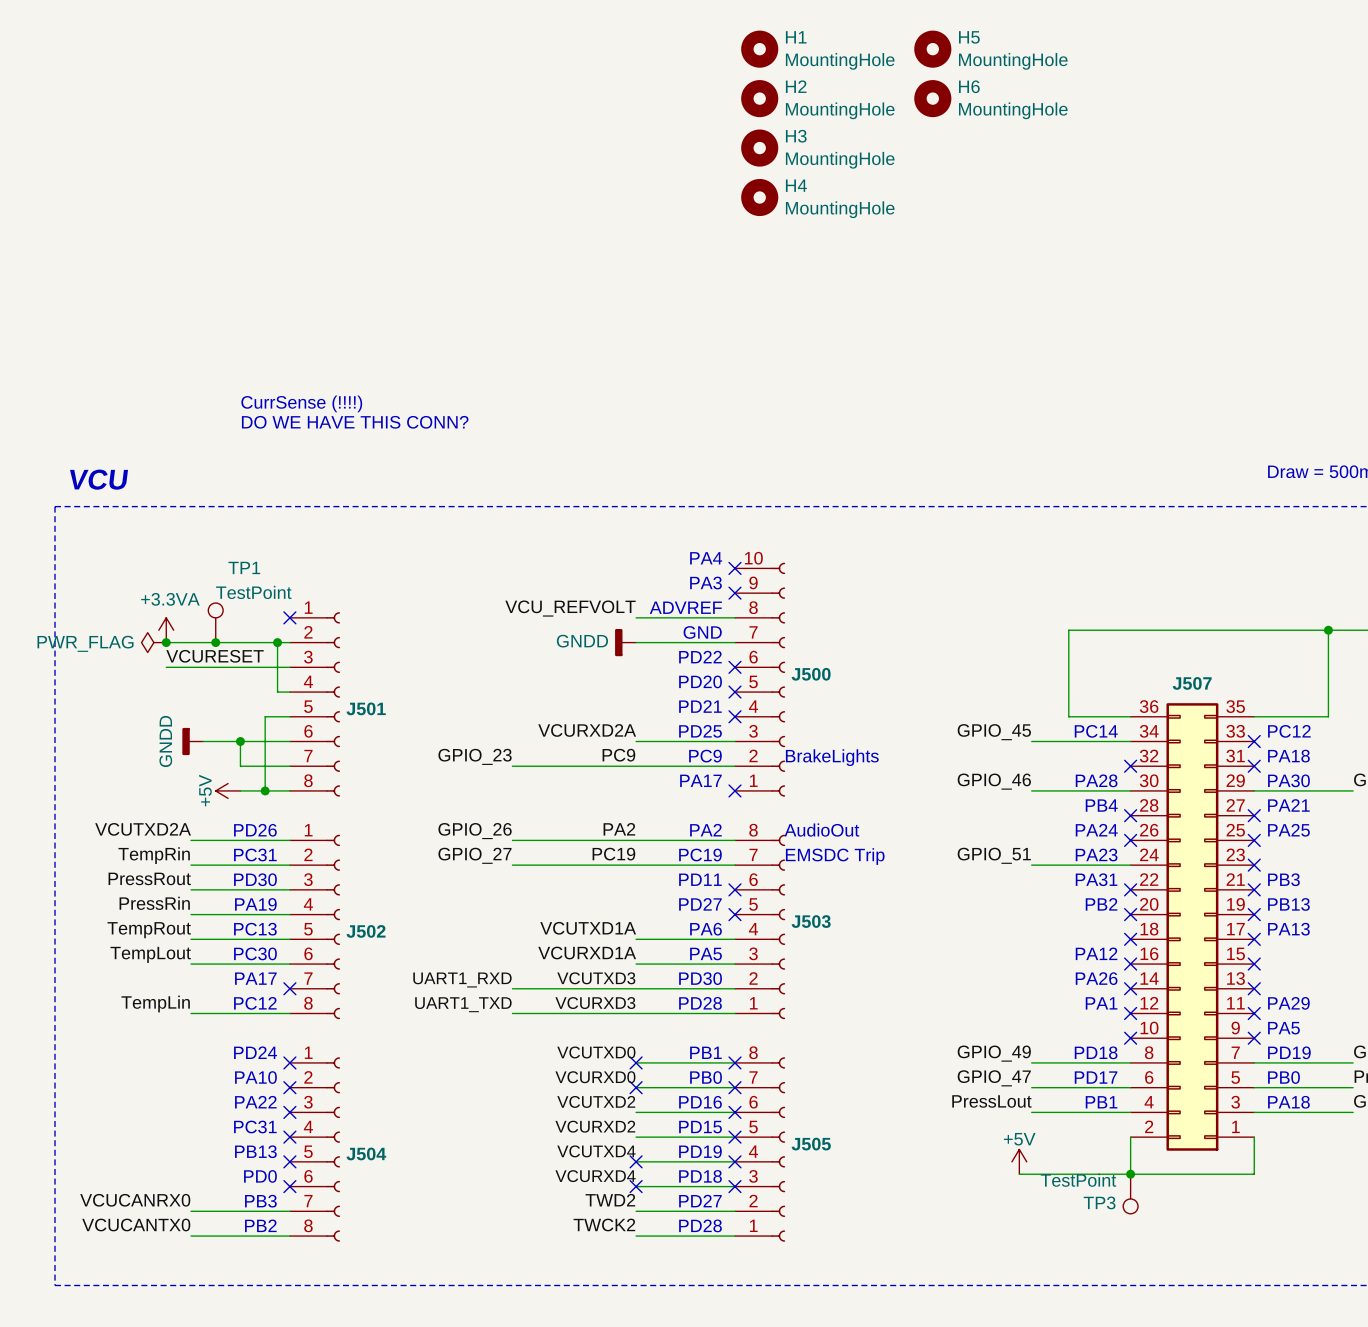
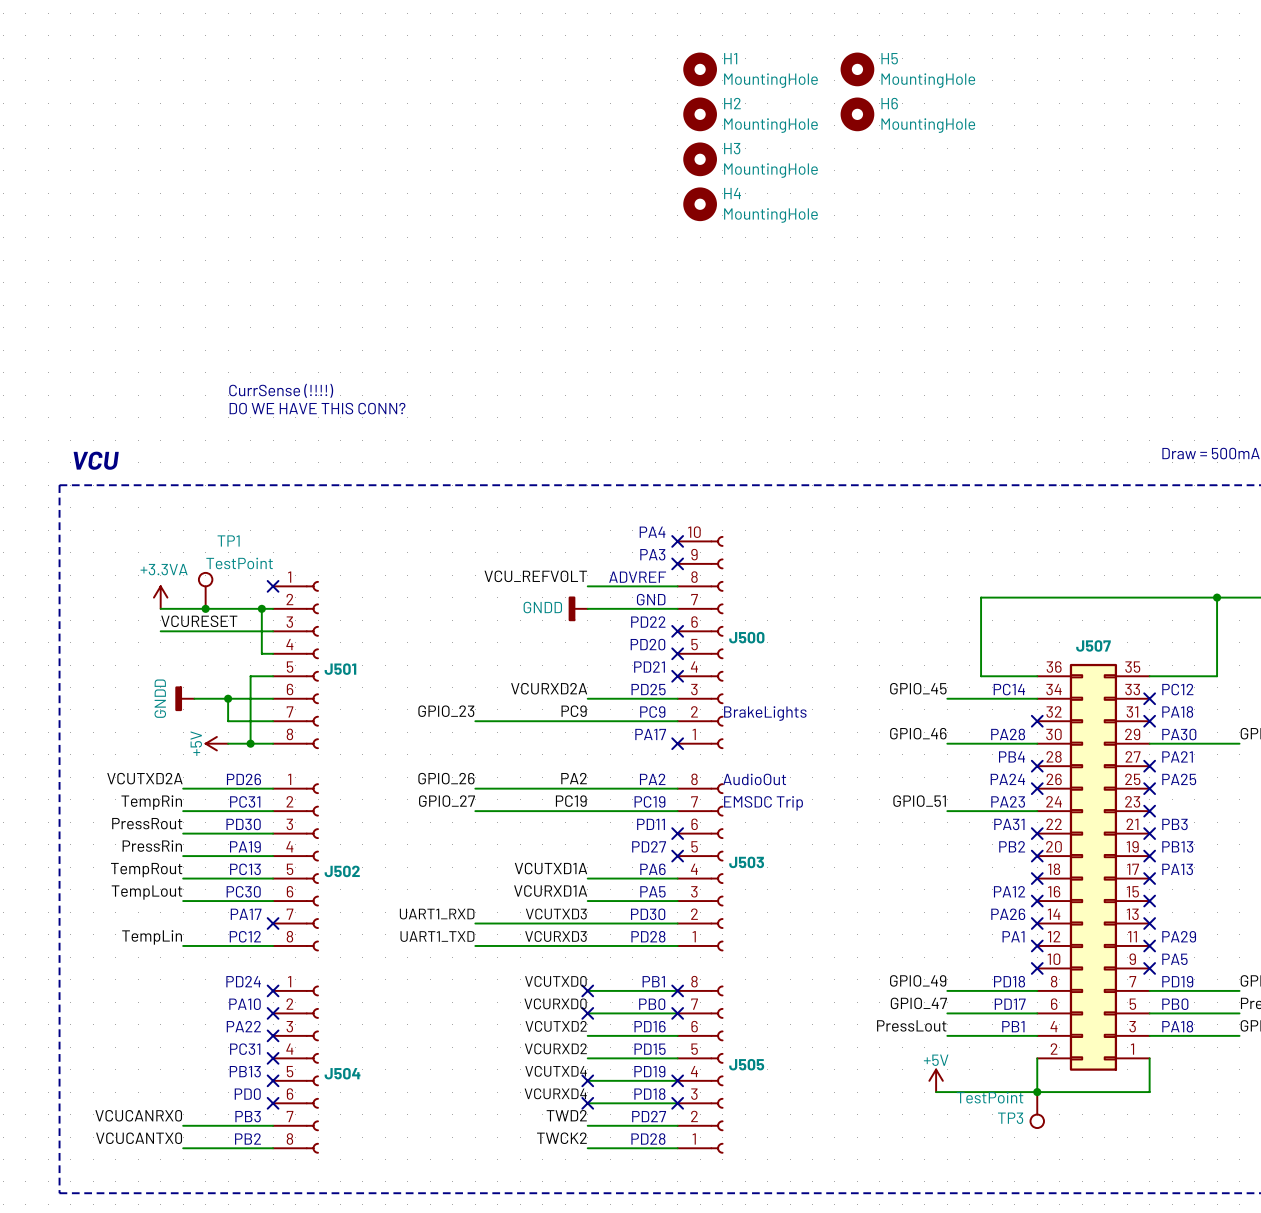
power symbol: PWR_FLAG (153, 642) -> none
junction: (166, 642) -> none
no-connect mark: (734, 1112) -> none
no-connect mark: (734, 1137) -> none

